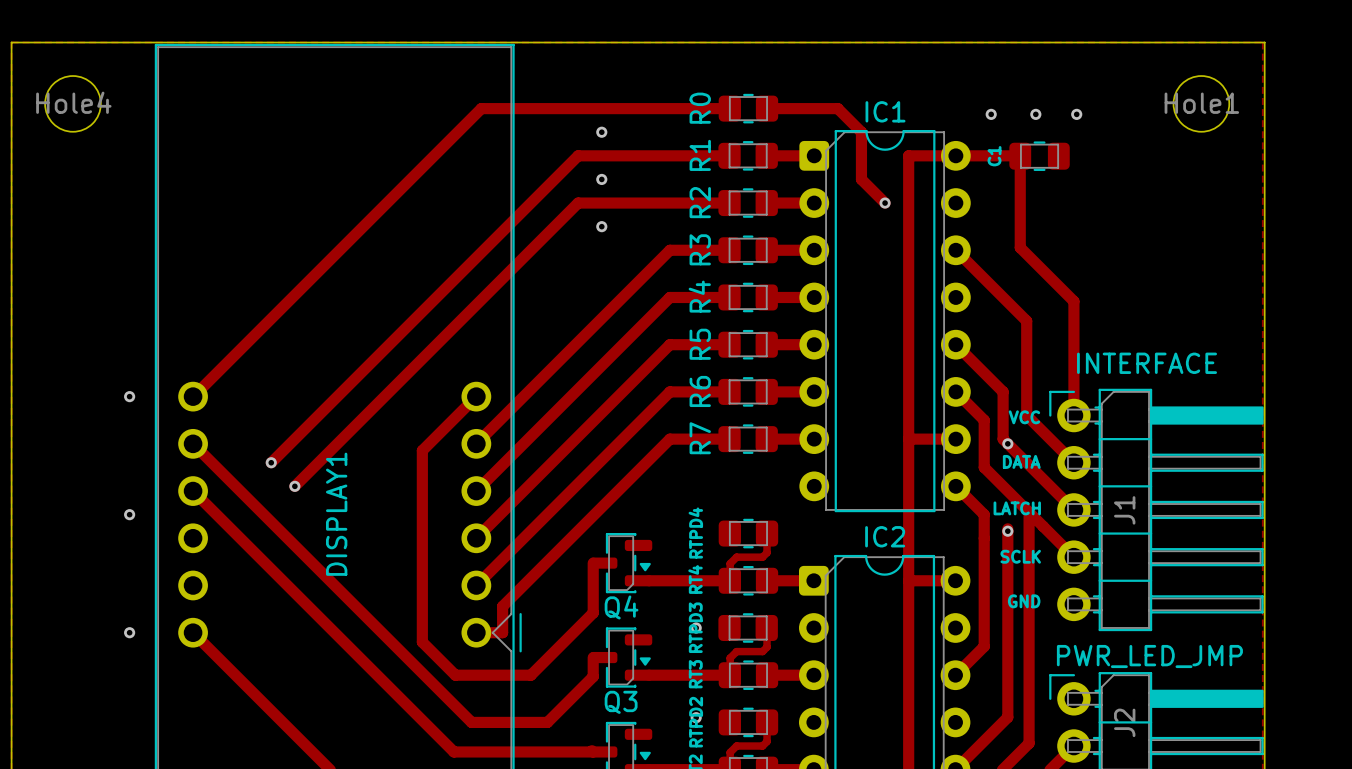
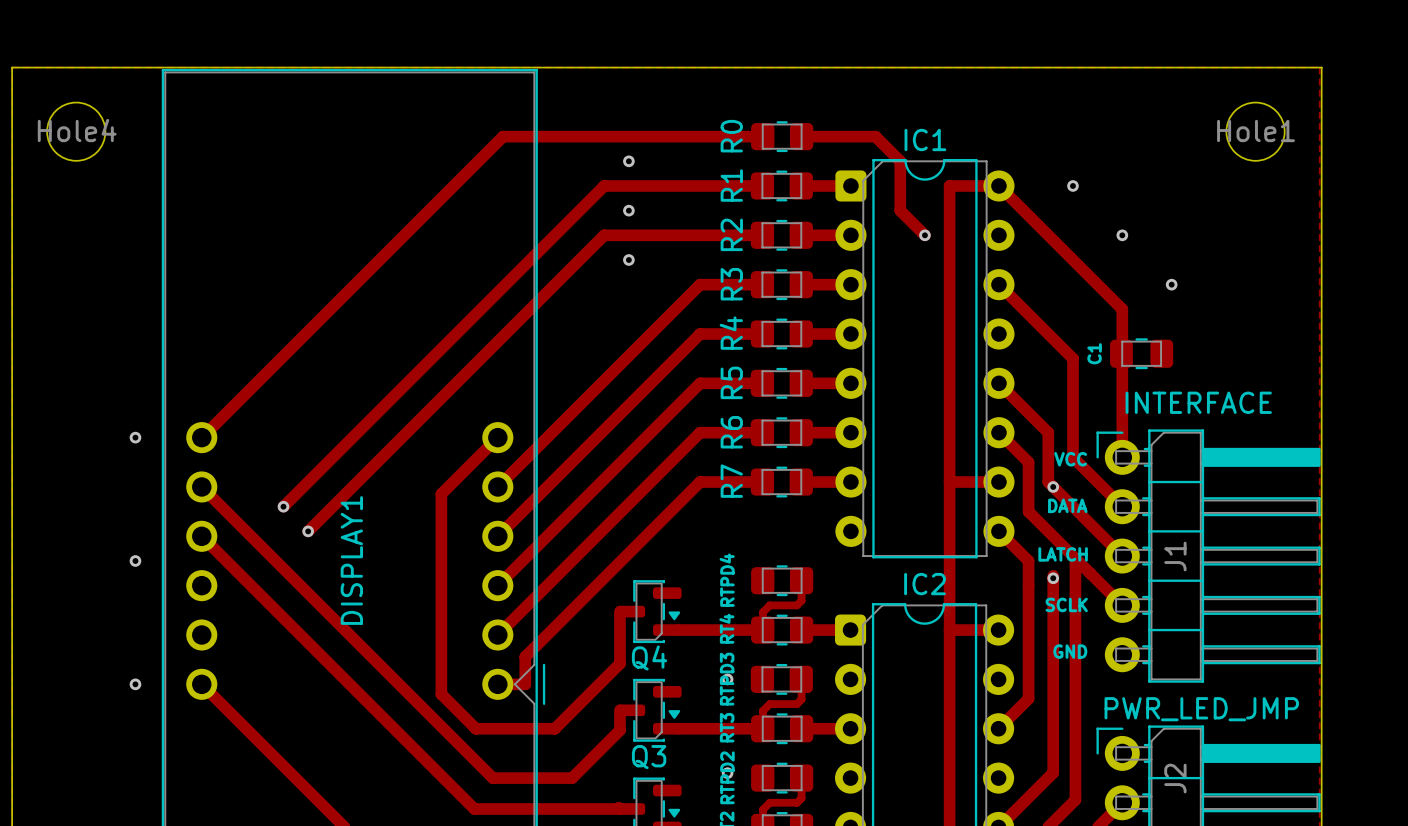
via: (991, 114) -> none
via: (1035, 114) -> none
via: (1076, 114) -> none
track: (955, 155) (1020, 156) (1020, 247) (1073, 301) -> (998, 185) (1122, 309) (1122, 338)
via: none -> (1072, 185)
C1 position: (1039, 156) -> (1141, 353)
via: none -> (1122, 235)
via: none -> (1171, 284)

